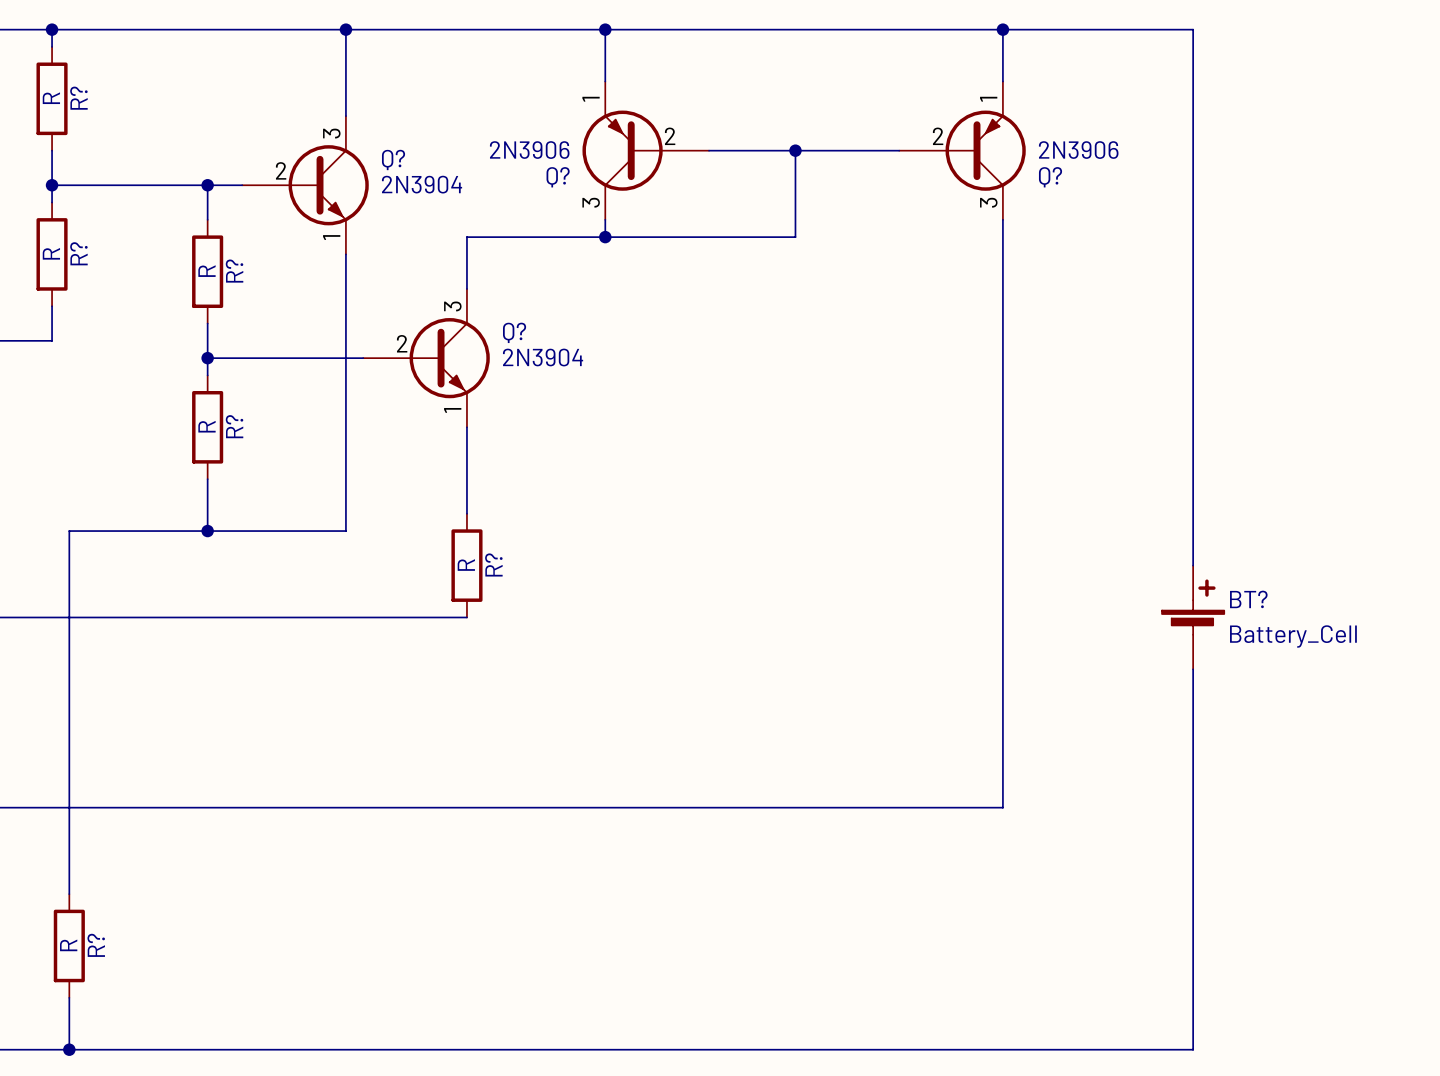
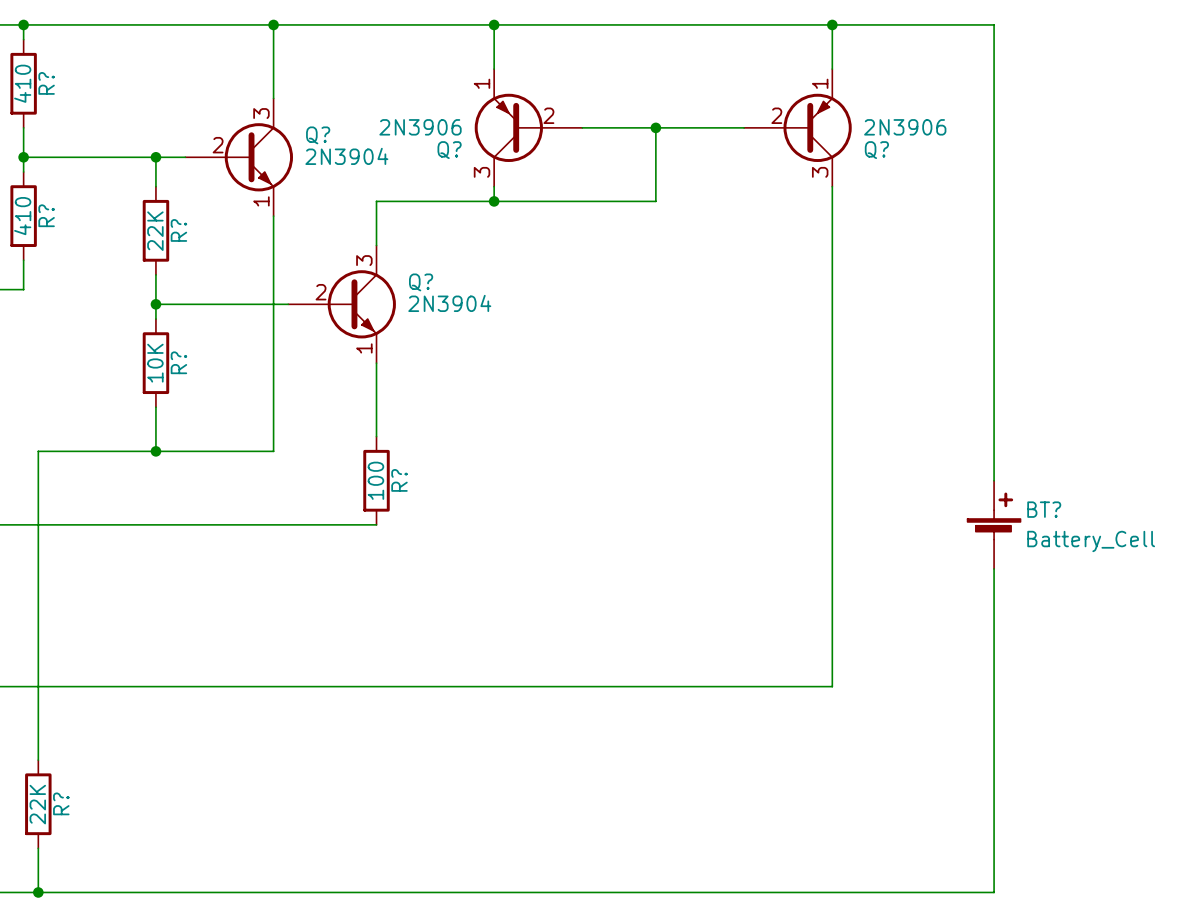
R? value: R (51, 98) -> 410 (22, 83)
R? value: R (51, 253) -> 410 (22, 216)
R? value: R (206, 271) -> 22K (155, 231)
R? value: R (206, 426) -> 10K (155, 363)
R? value: R (466, 565) -> 100 (375, 480)
R? value: R (68, 945) -> 22K (37, 804)

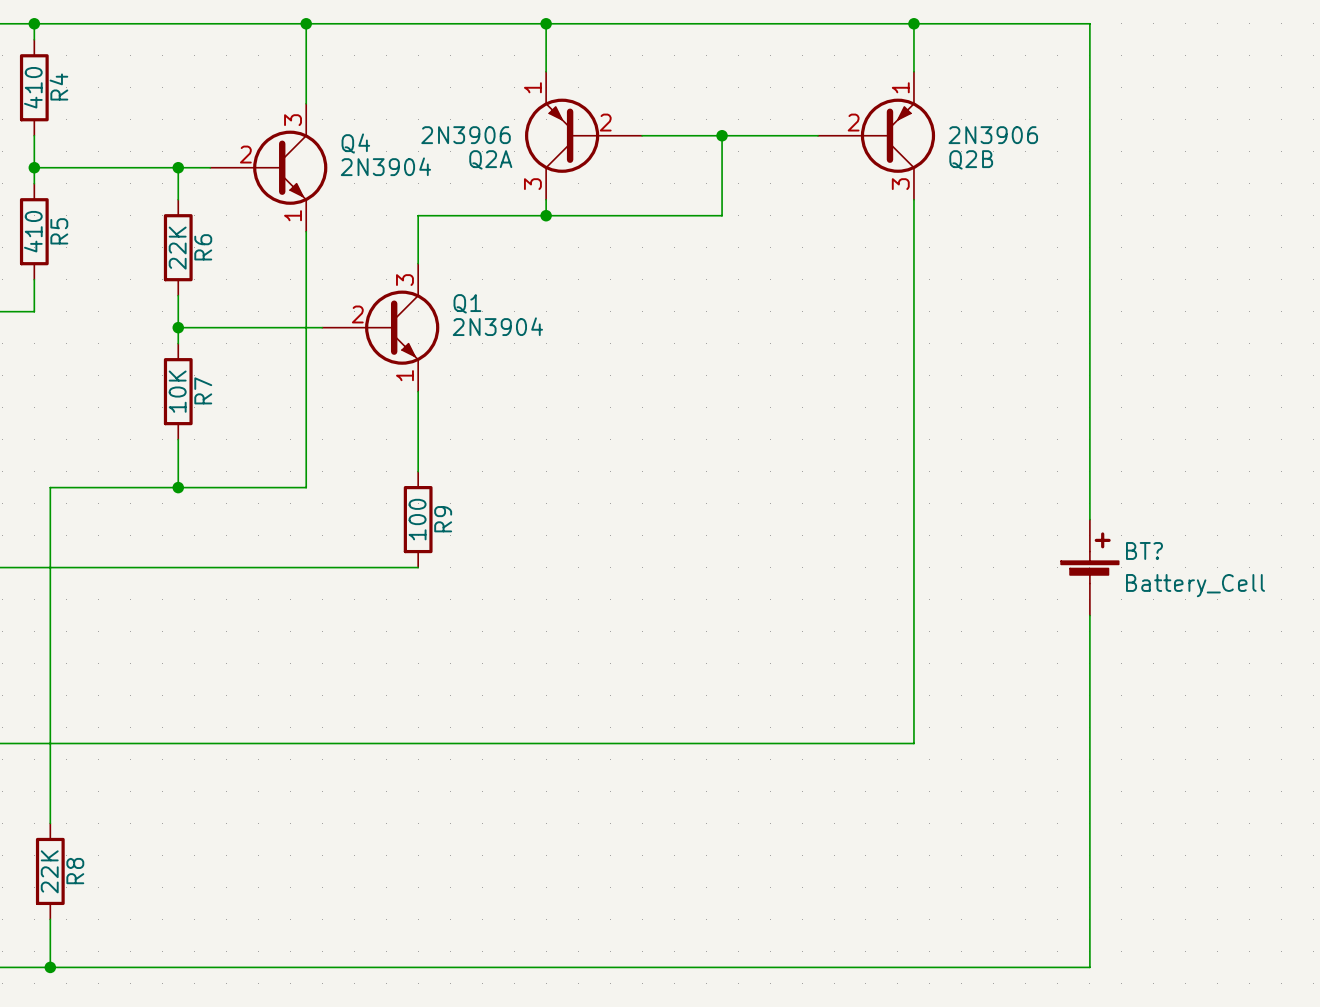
R? name: R? (46, 83) -> R4 (58, 87)
Q? name: Q? (318, 135) -> Q4 (355, 143)
Q? name: Q? (449, 150) -> Q2A (490, 159)
Q? name: Q? (876, 150) -> Q2B (971, 159)
R? name: R? (46, 215) -> R5 (59, 231)
R? name: R? (178, 230) -> R6 (203, 247)
Q? name: Q? (421, 282) -> Q1 (467, 303)
R? name: R? (178, 362) -> R7 (203, 390)
R? name: R? (399, 480) -> R9 (443, 519)
R? name: R? (61, 803) -> R8 (75, 871)

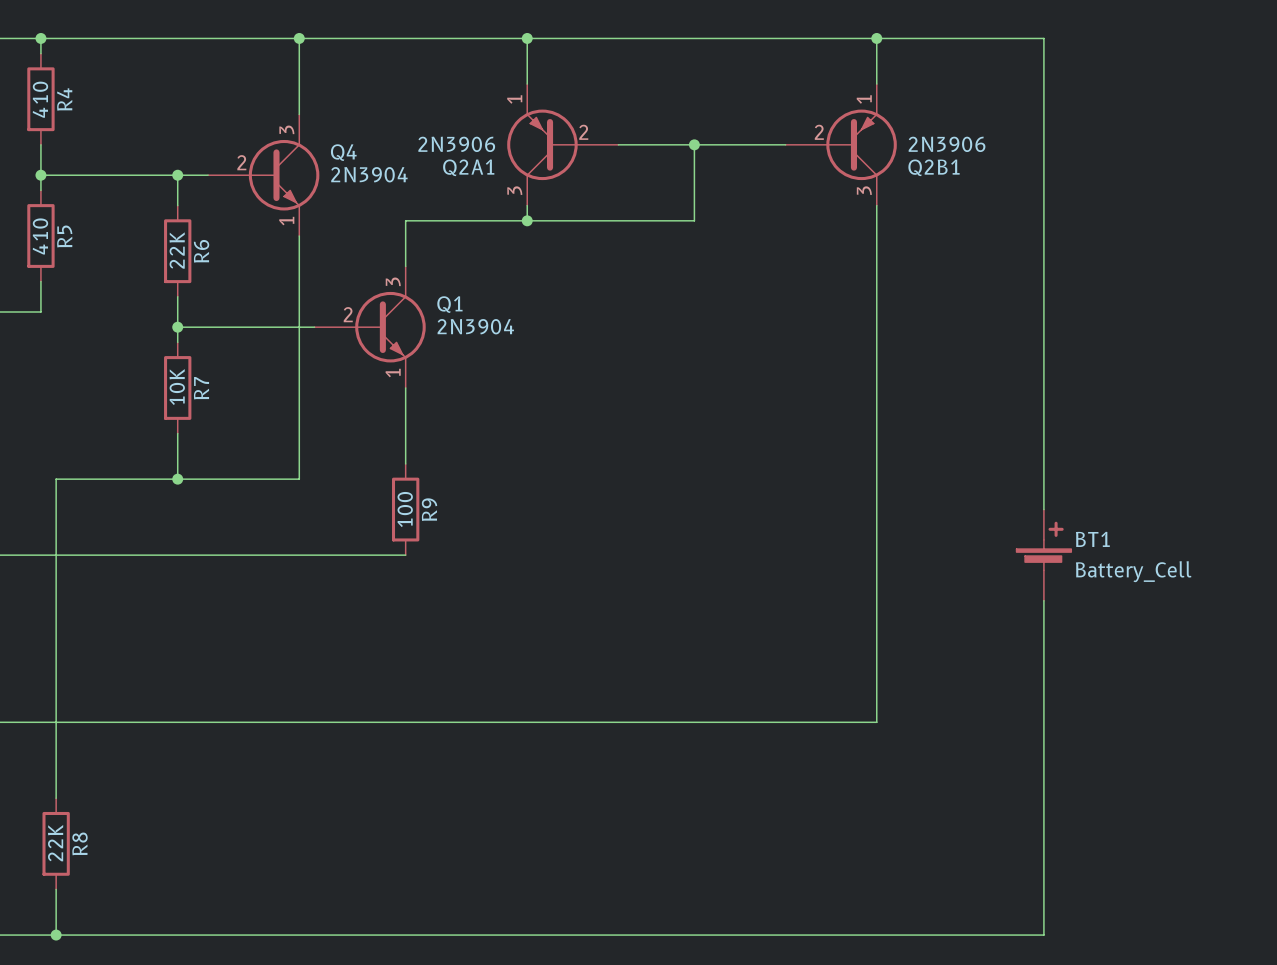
Q2A name: Q2A (490, 159) -> Q2A1 (468, 167)
Q2B name: Q2B (971, 159) -> Q2B1 (934, 167)
BT? name: BT? (1144, 550) -> BT1 (1092, 539)

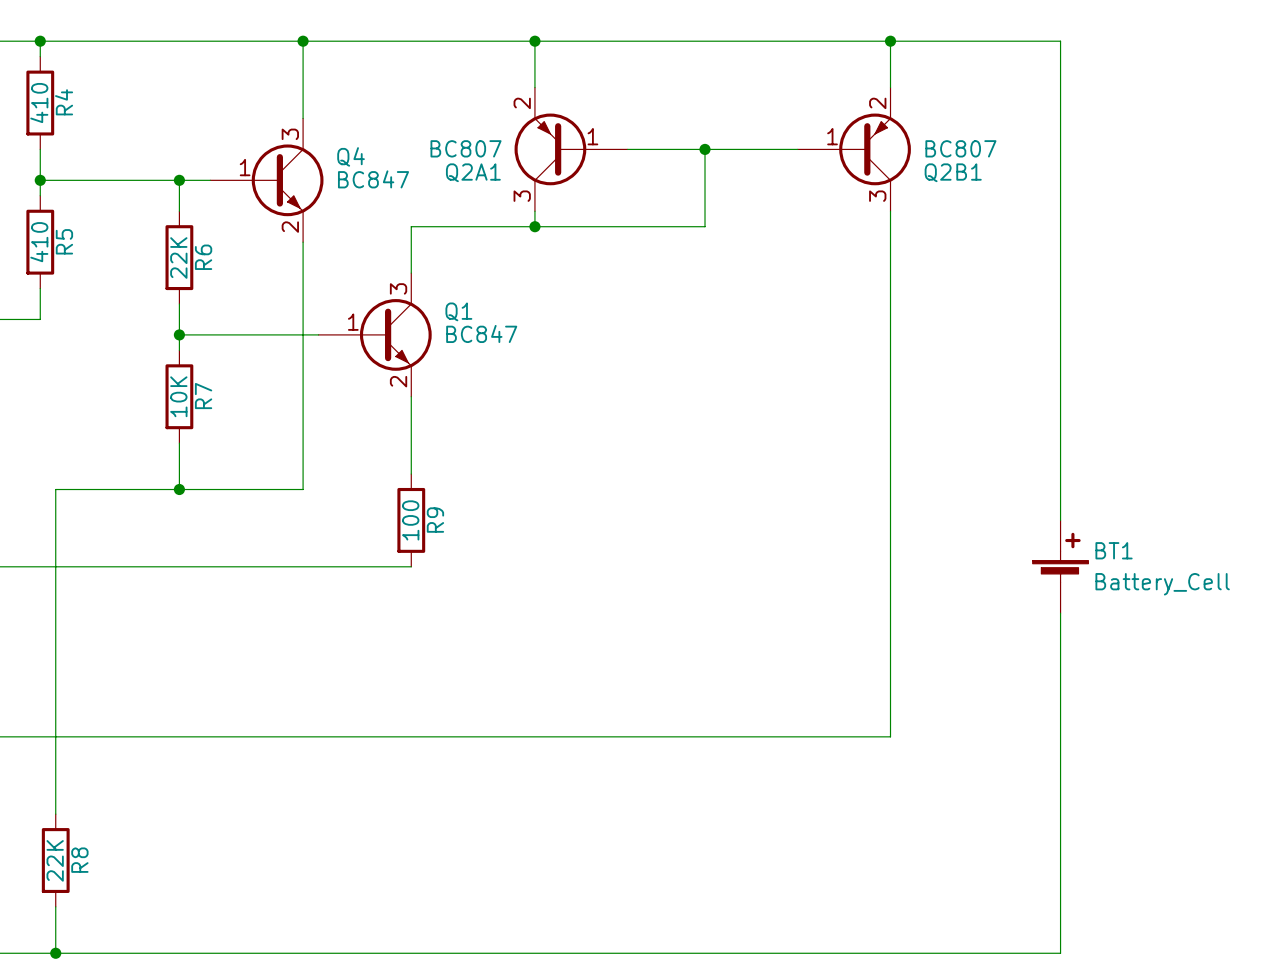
Q2A1 pin number: 1 (514, 99) -> 2 (522, 103)
Q2B1 pin number: 1 (864, 99) -> 2 (877, 103)
Q2A1 pin number: 2 (583, 132) -> 1 (592, 136)
Q2B1 pin number: 2 (819, 132) -> 1 (832, 136)
Q2A1 value: 2N3906 (456, 144) -> BC807 (466, 148)
Q2B1 value: 2N3906 (947, 144) -> BC807 (960, 148)
Q4 pin number: 2 (241, 162) -> 1 (245, 167)
Q4 value: 2N3904 (369, 174) -> BC847 (373, 179)
Q4 pin number: 1 (286, 221) -> 2 (290, 227)
Q1 pin number: 2 (348, 314) -> 1 (353, 322)
Q1 value: 2N3904 (475, 326) -> BC847 (481, 333)
Q1 pin number: 1 (393, 373) -> 2 (398, 381)

